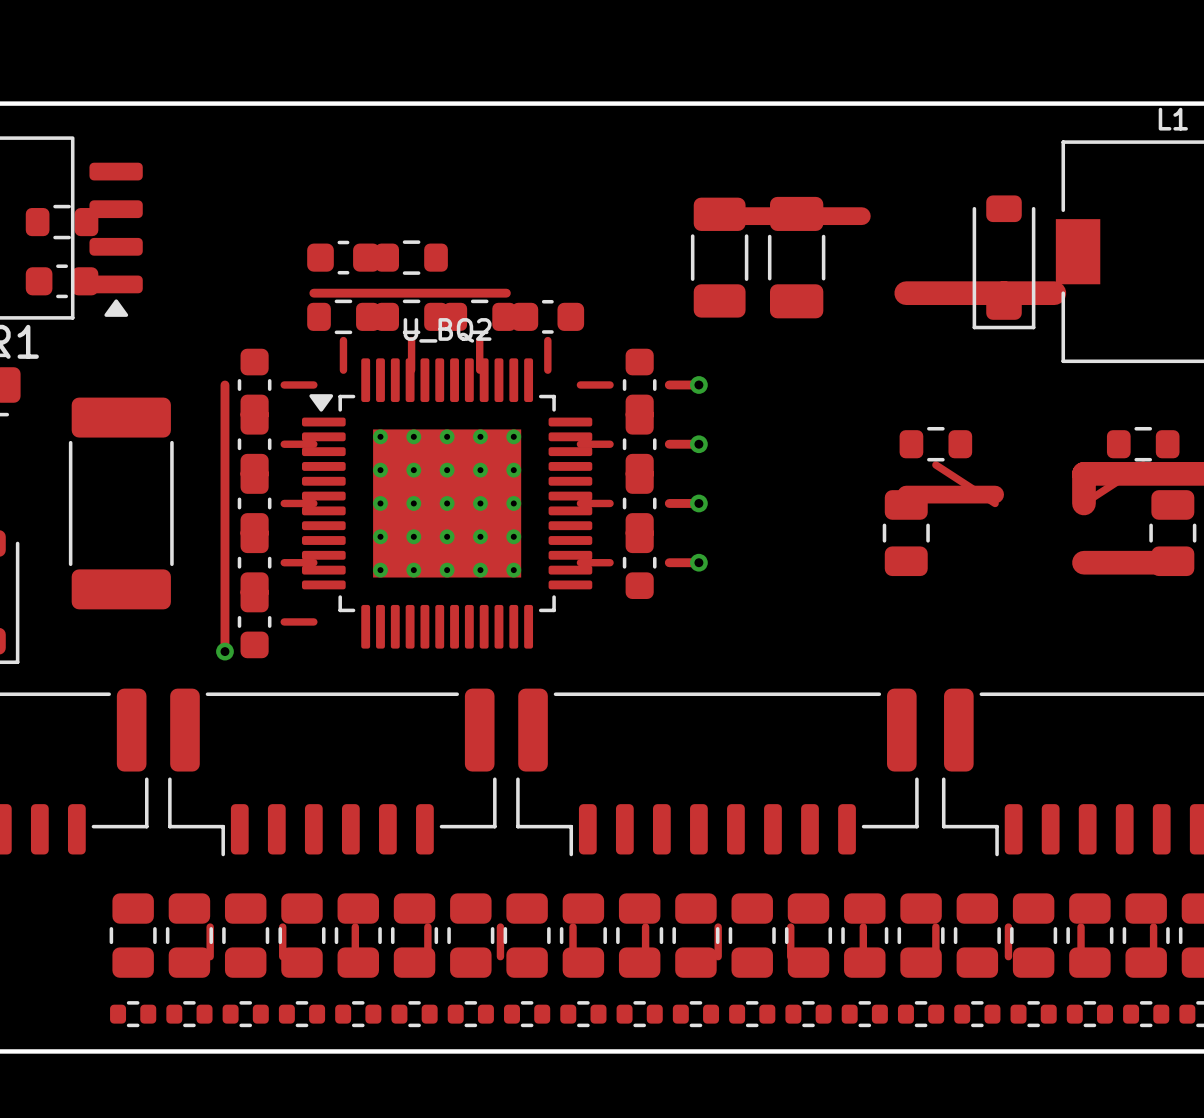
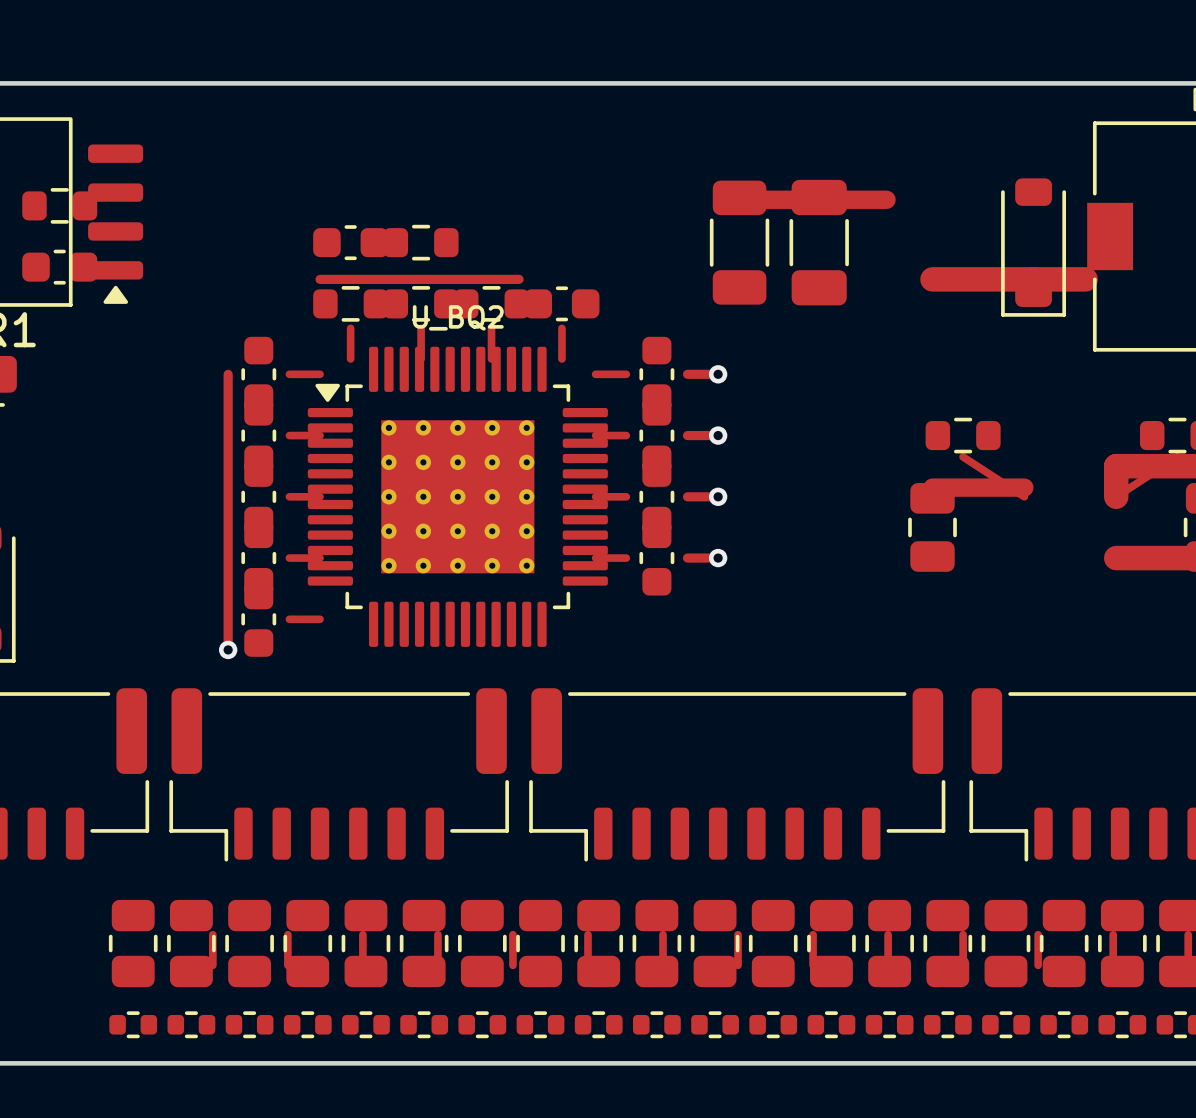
part: (121, 503) -> none

